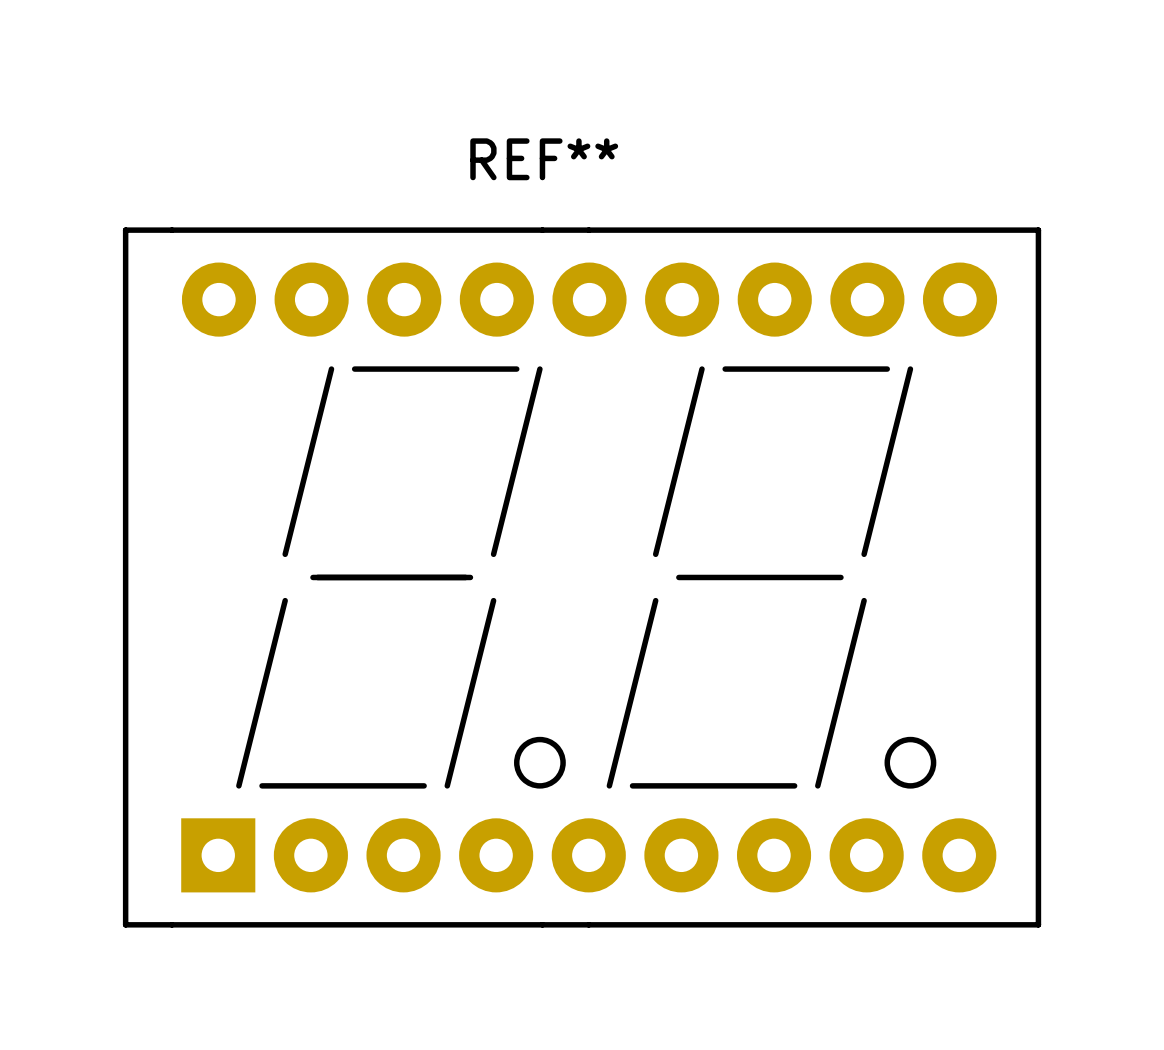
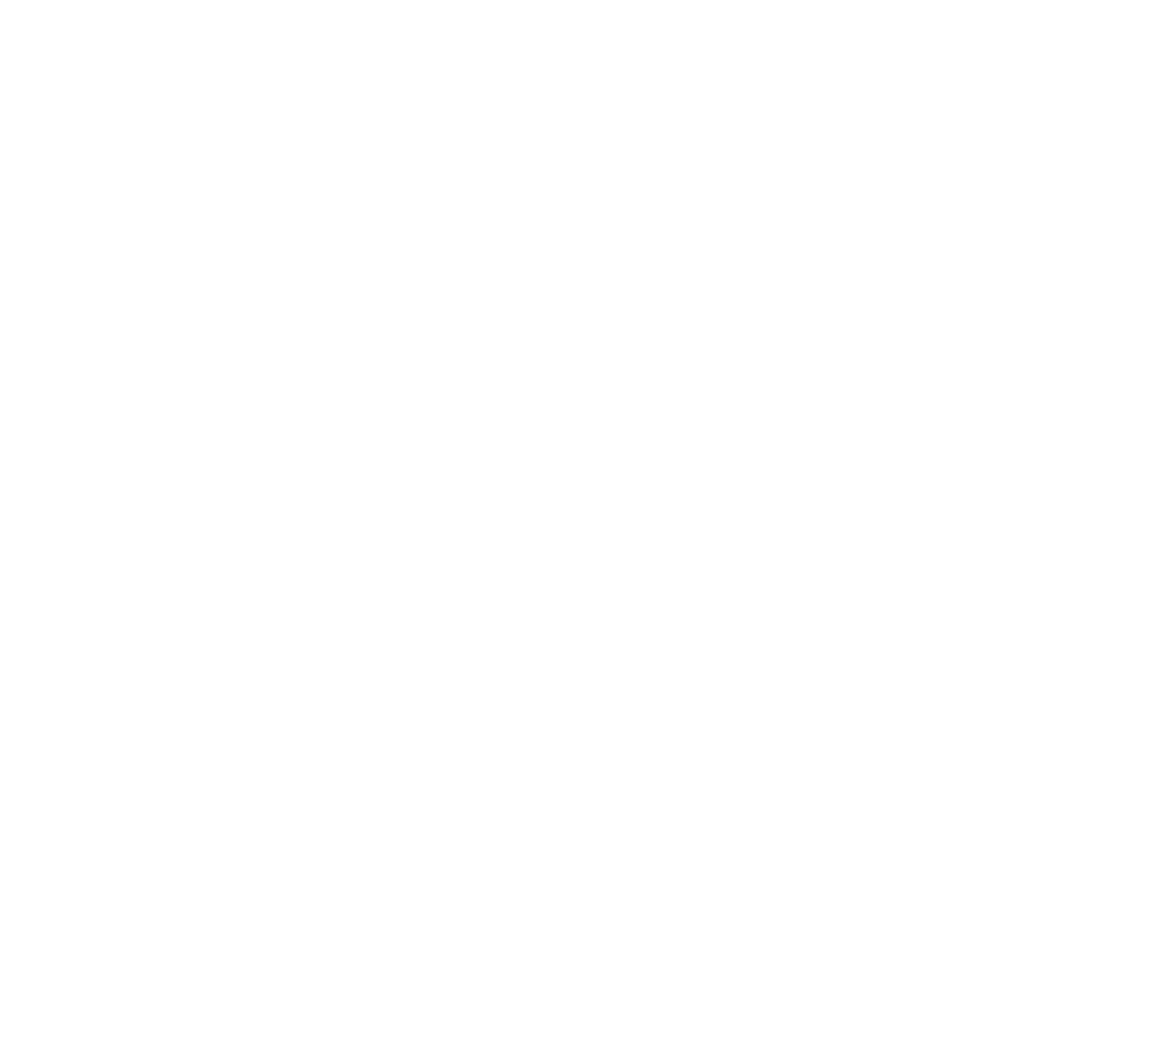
REF**: (582, 577) -> none

